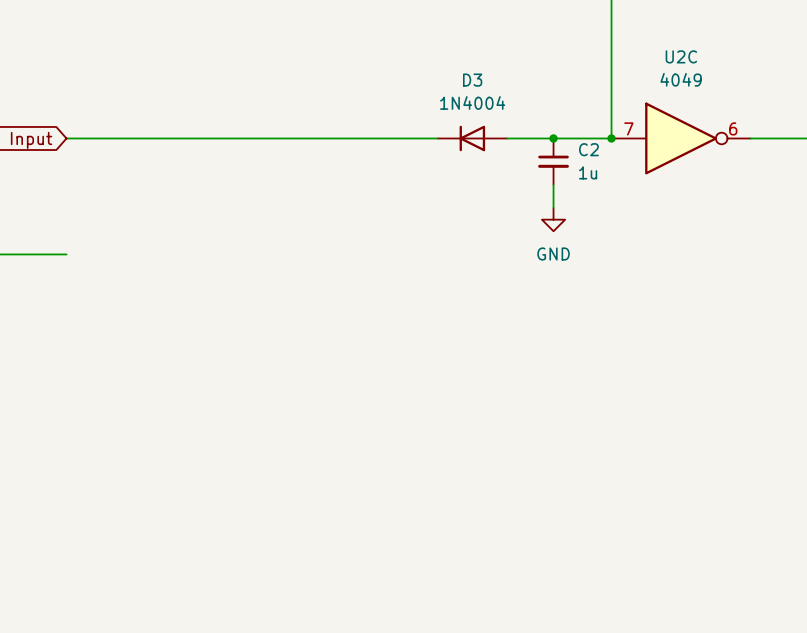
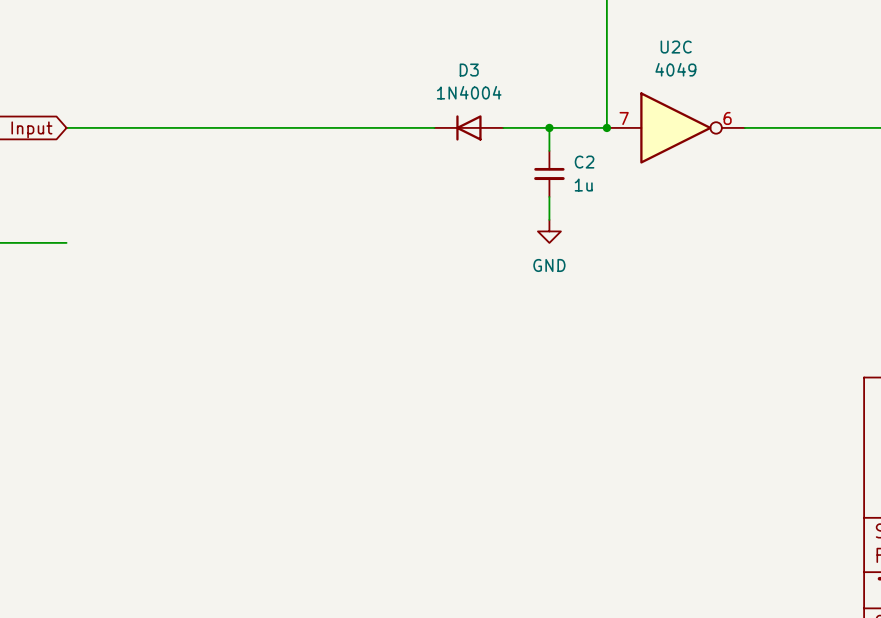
C2 position: (553, 161) -> (549, 173)
power symbol position: GND (553, 219) -> GND (549, 231)

